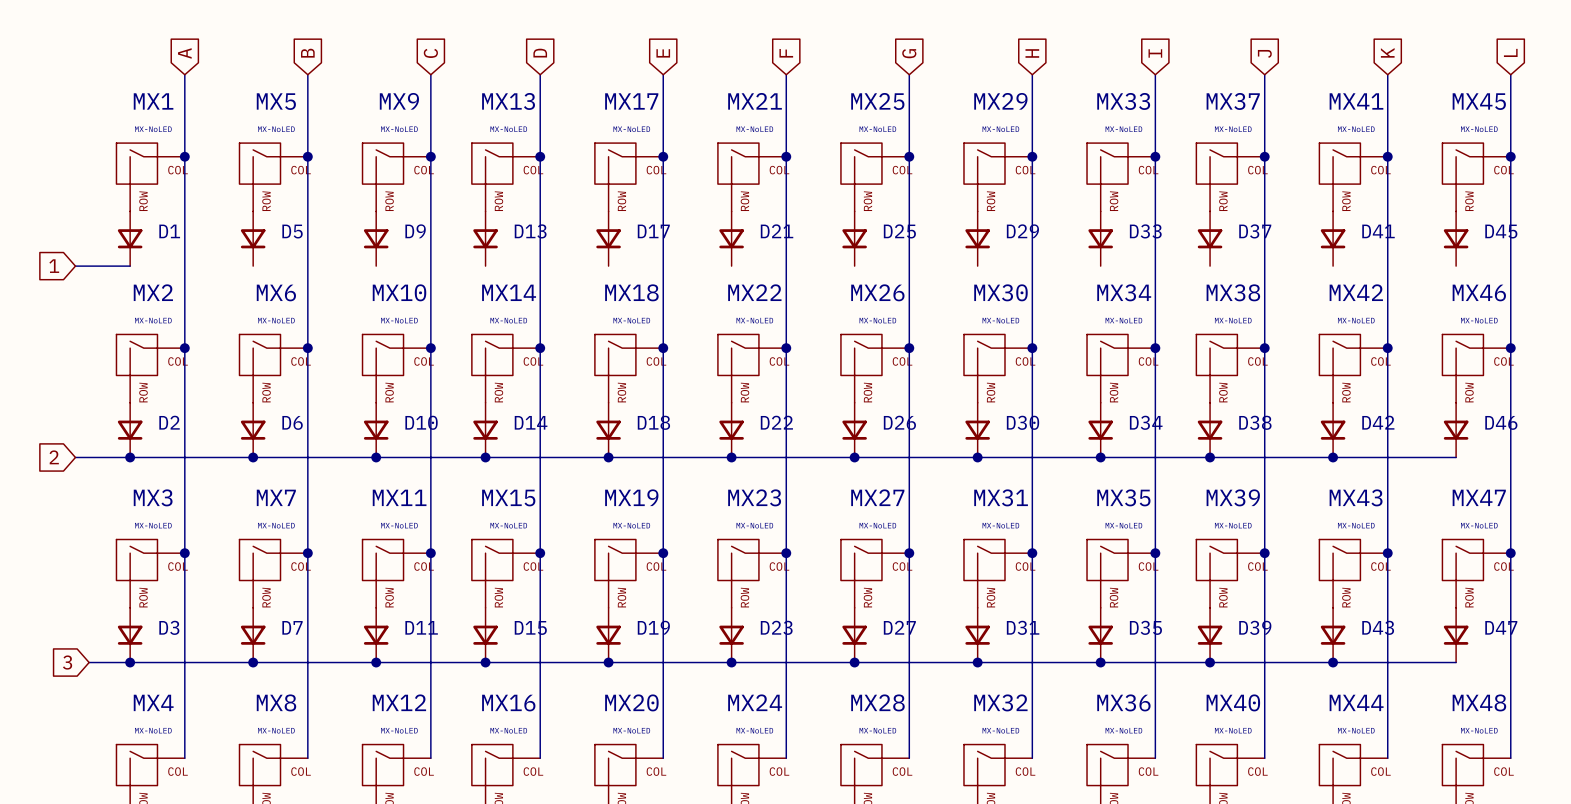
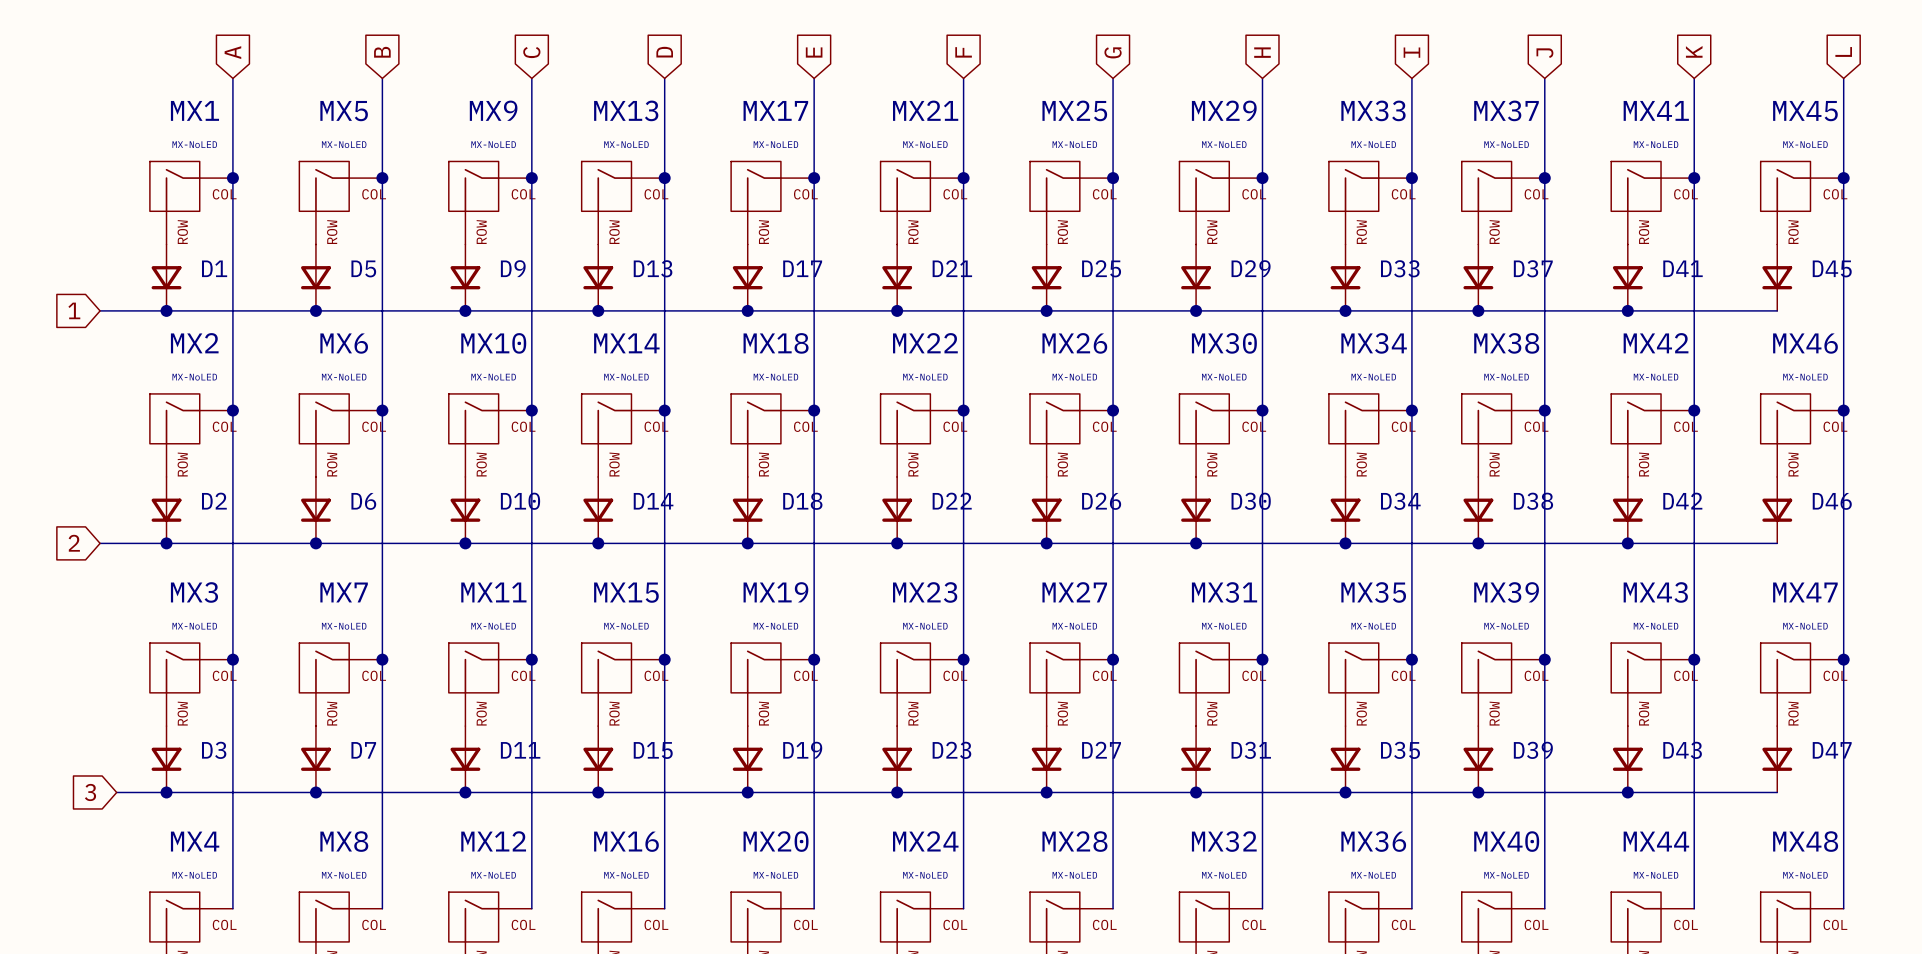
wire: none -> (166, 310) (1777, 310)
junction: none -> (166, 310)
junction: none -> (315, 310)
junction: none -> (465, 310)
junction: none -> (598, 310)
junction: none -> (747, 310)
junction: none -> (897, 310)
junction: none -> (1046, 310)
junction: none -> (1196, 310)
junction: none -> (1345, 310)
junction: none -> (1478, 310)
junction: none -> (1627, 310)

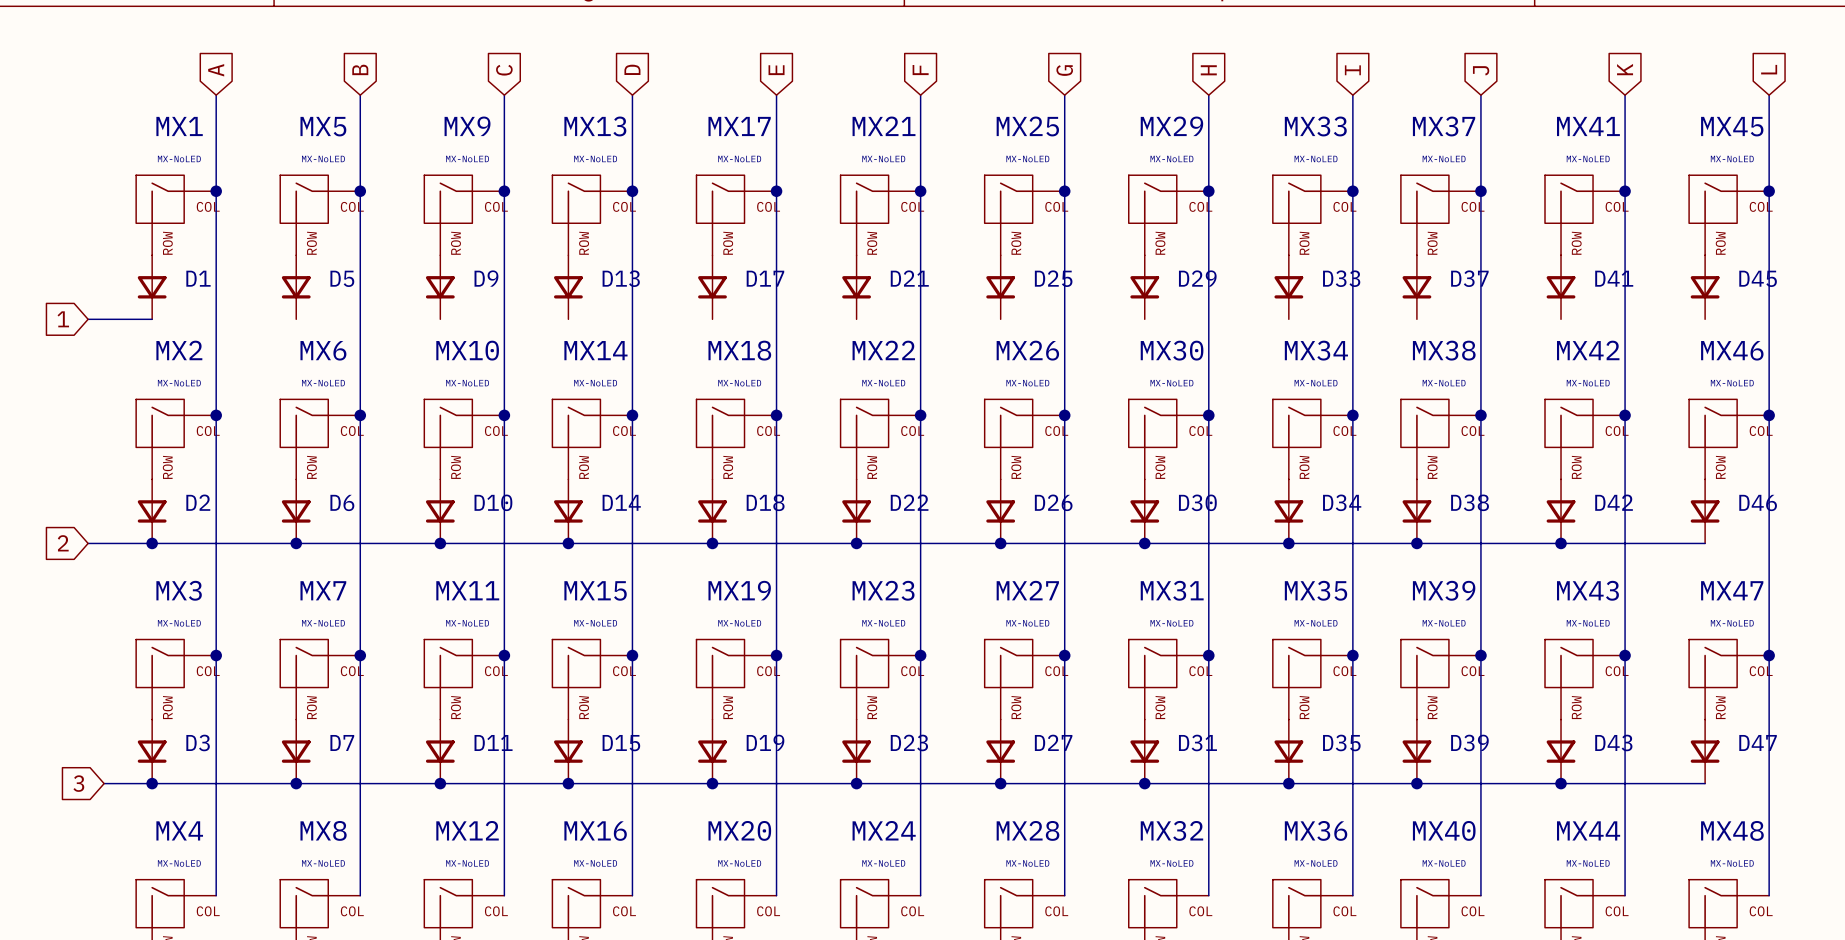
wire: (166, 310) (1777, 310) -> none
junction: (166, 310) -> none
junction: (315, 310) -> none
junction: (465, 310) -> none
junction: (598, 310) -> none
junction: (747, 310) -> none
junction: (897, 310) -> none
junction: (1046, 310) -> none
junction: (1196, 310) -> none
junction: (1345, 310) -> none
junction: (1478, 310) -> none
junction: (1627, 310) -> none

